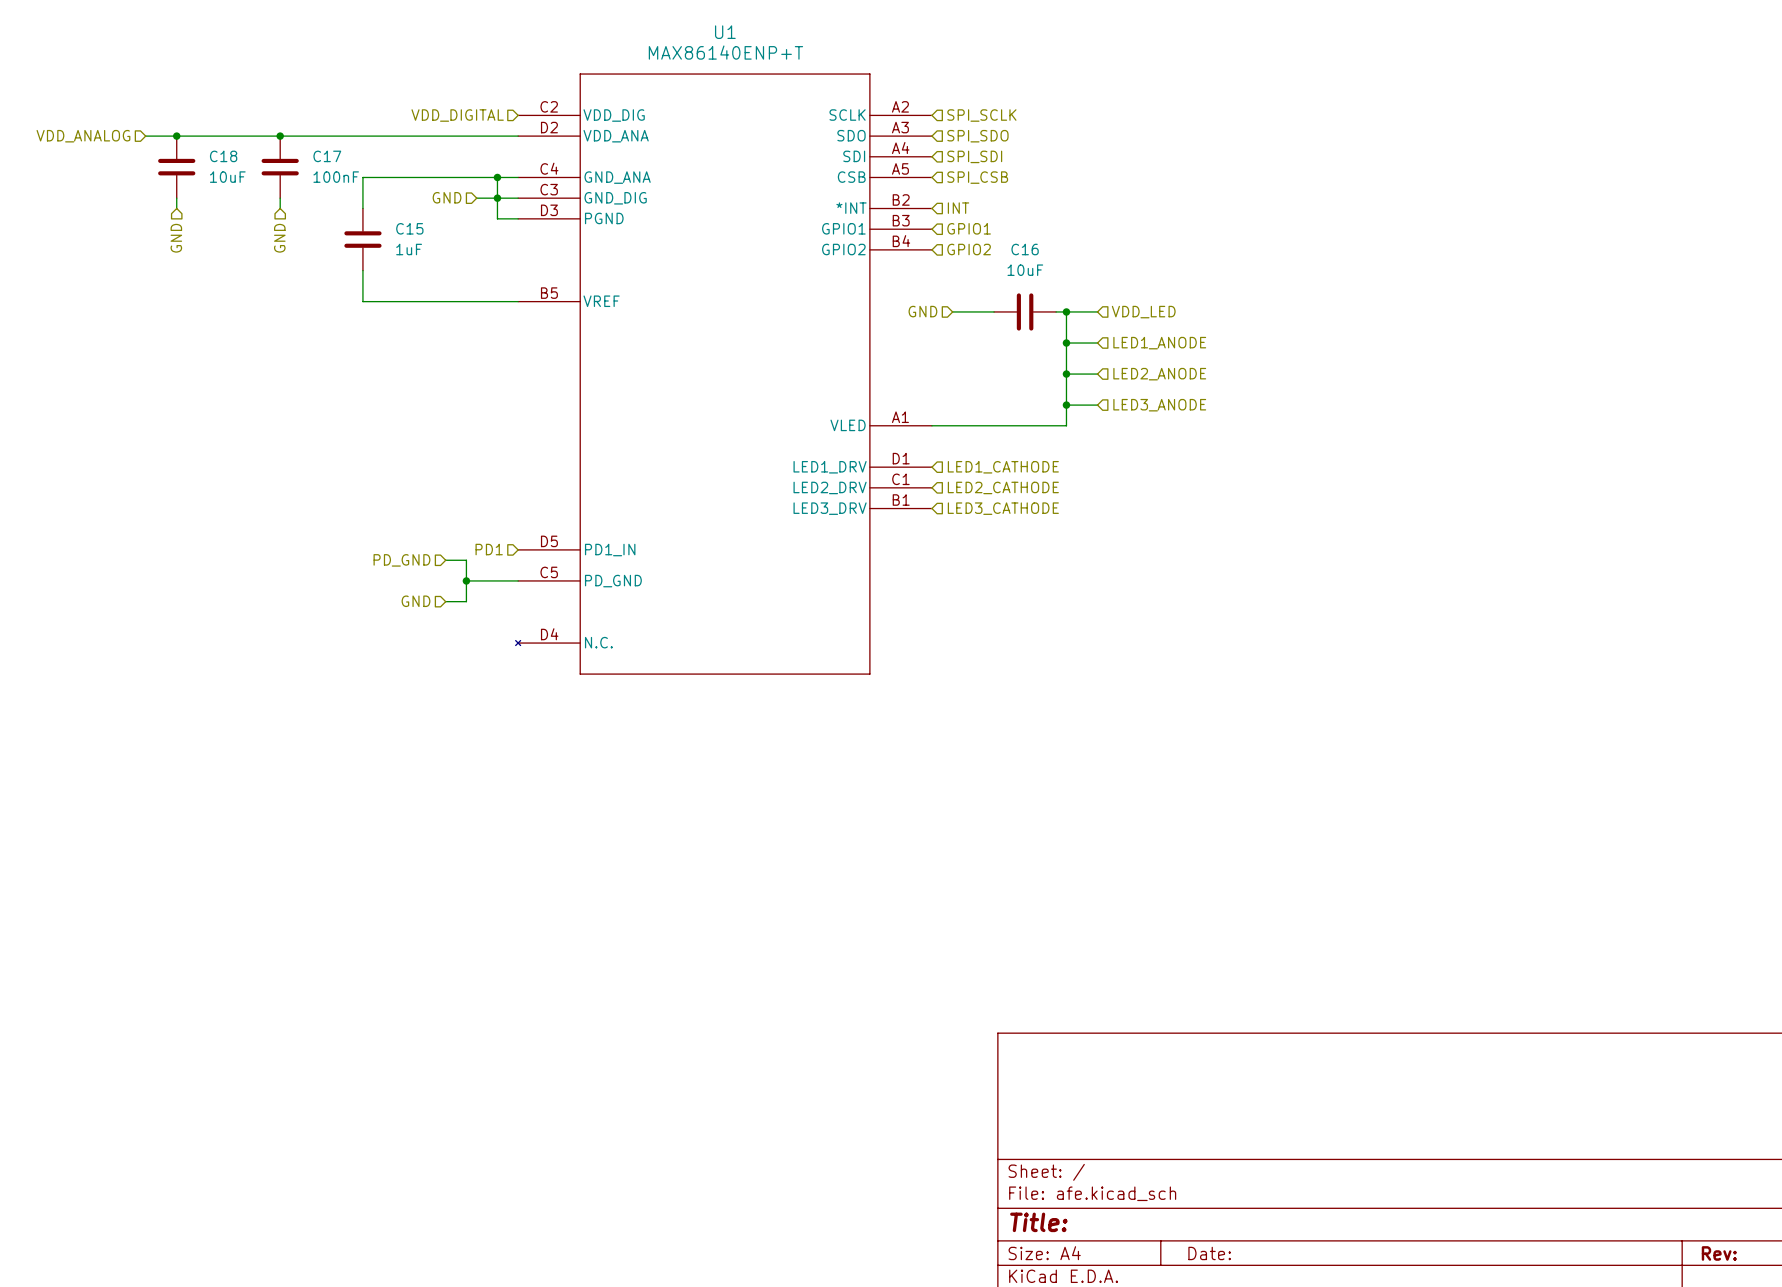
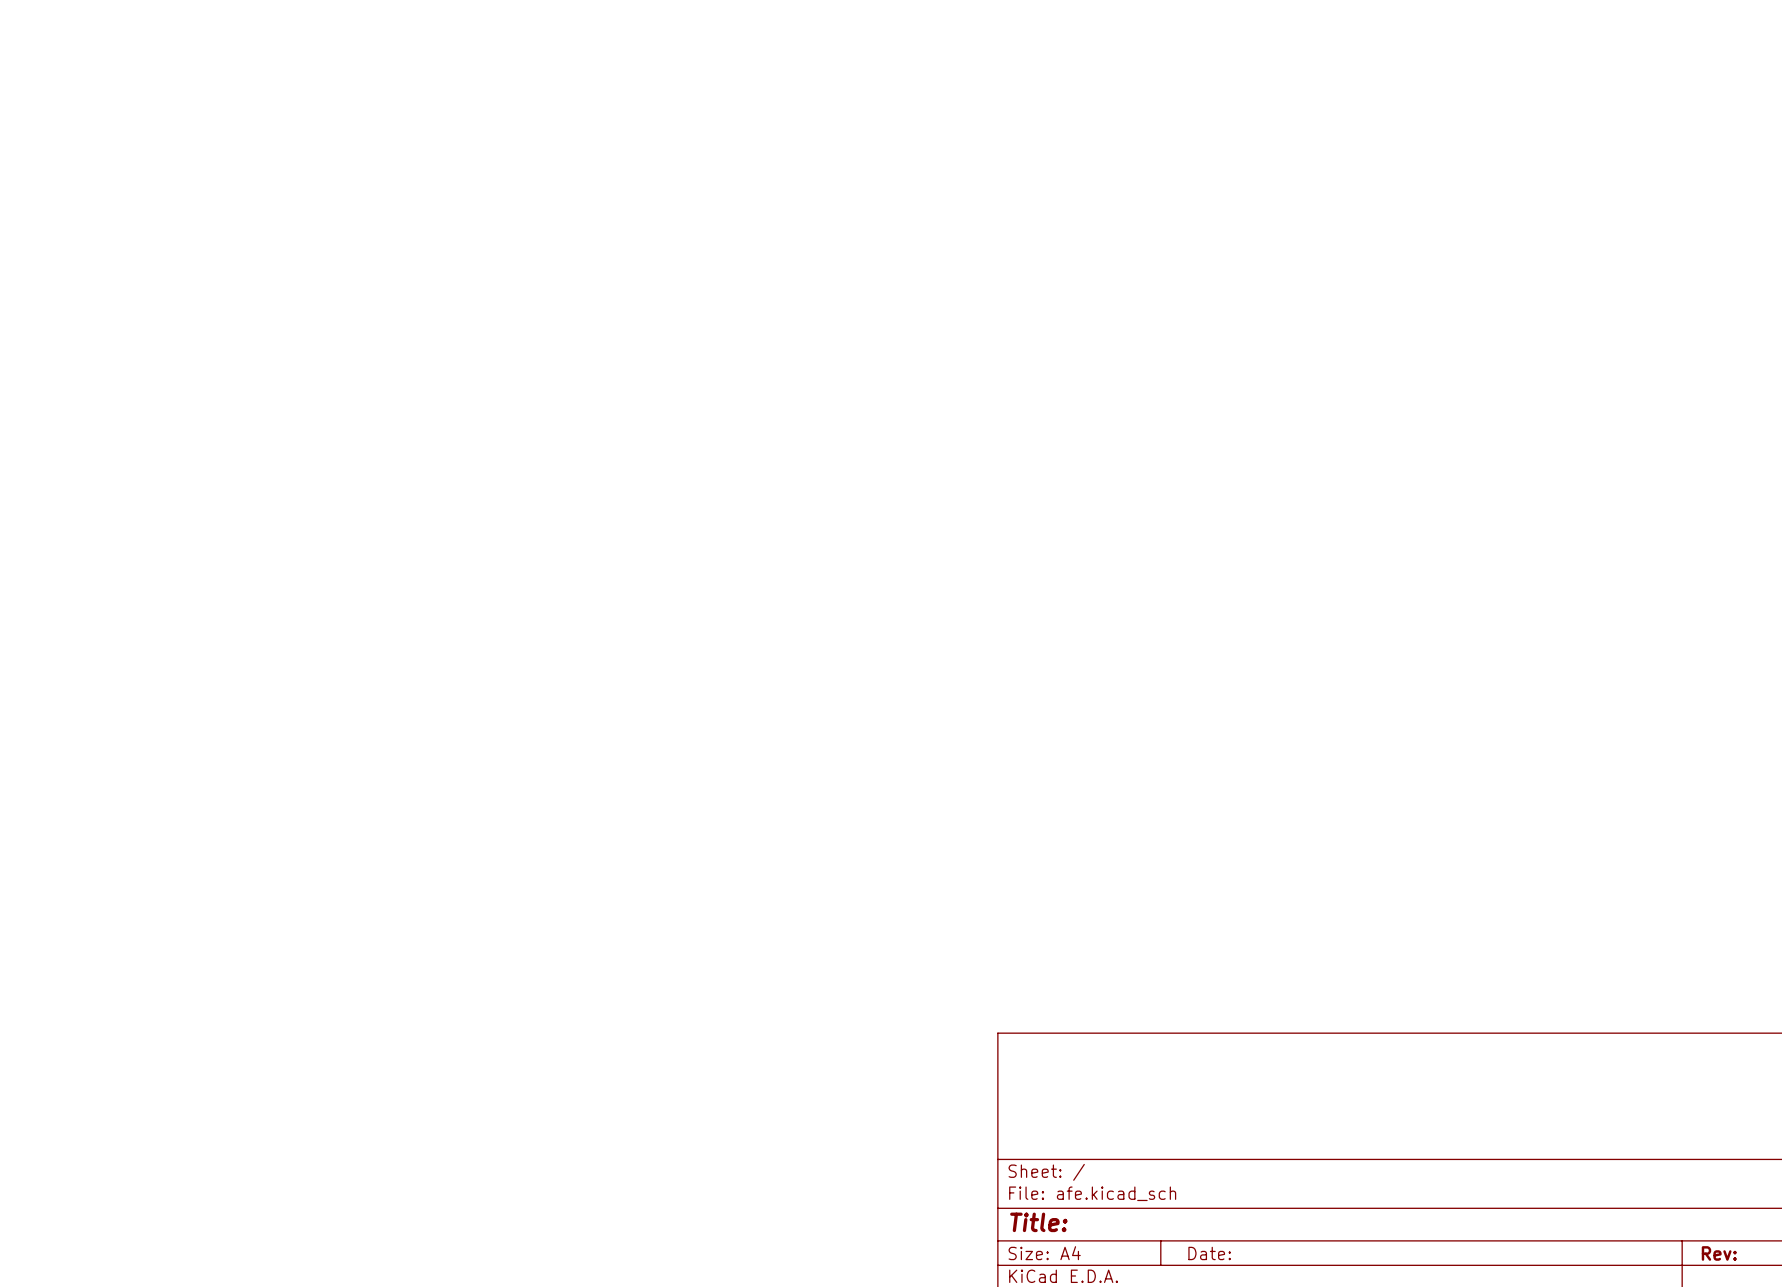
hierarchical label: VDD_DIGITAL (457, 115) -> none
hierarchical label: SPI_SCLK (981, 115) -> none
hierarchical label: VDD_ANALOG (83, 136) -> none
wire: (145, 136) (518, 136) -> none
junction: (176, 136) -> none
junction: (280, 136) -> none
hierarchical label: SPI_SDO (977, 136) -> none
hierarchical label: SPI_SDI (974, 156) -> none
C18: 10uF (176, 167) -> none
C17: 100nF (280, 167) -> none
wire: (497, 177) (497, 218) (518, 218) -> none
junction: (497, 177) -> none
wire: (518, 177) (362, 177) (362, 208) -> none
hierarchical label: SPI_CSB (977, 177) -> none
hierarchical label: GND (447, 197) -> none
wire: (176, 198) (176, 208) -> none
wire: (280, 198) (280, 208) -> none
wire: (476, 198) (518, 198) -> none
junction: (497, 198) -> none
hierarchical label: INT (958, 208) -> none
hierarchical label: GPIO1 (969, 228) -> none
hierarchical label: GND (176, 238) -> none
hierarchical label: GND (279, 238) -> none
C15: 1uF (362, 239) -> none
hierarchical label: GPIO2 (969, 249) -> none
wire: (362, 270) (362, 301) (518, 301) -> none
hierarchical label: GND (922, 311) -> none
wire: (952, 311) (994, 311) -> none
C16: 10uF (1025, 311) -> none
wire: (1056, 311) (1097, 311) -> none
wire: (1066, 311) (1066, 425) (931, 425) -> none
junction: (1066, 311) -> none
hierarchical label: VDD_LED (1143, 312) -> none
wire: (1066, 343) (1097, 343) -> none
junction: (1066, 343) -> none
hierarchical label: LED1_ANODE (1159, 343) -> none
U1: MAX86140ENP+T (723, 374) -> none
wire: (1066, 374) (1097, 374) -> none
junction: (1066, 374) -> none
hierarchical label: LED2_ANODE (1159, 374) -> none
wire: (1066, 405) (1097, 405) -> none
junction: (1066, 405) -> none
hierarchical label: LED3_ANODE (1159, 405) -> none
hierarchical label: LED1_CATHODE (1003, 467) -> none
hierarchical label: LED2_CATHODE (1003, 487) -> none
hierarchical label: LED3_CATHODE (1003, 508) -> none
hierarchical label: PD1 (489, 549) -> none
hierarchical label: PD_GND (401, 560) -> none
wire: (445, 560) (466, 560) (466, 601) (445, 601) -> none
wire: (466, 580) (518, 580) -> none
junction: (466, 580) -> none
hierarchical label: GND (416, 601) -> none

